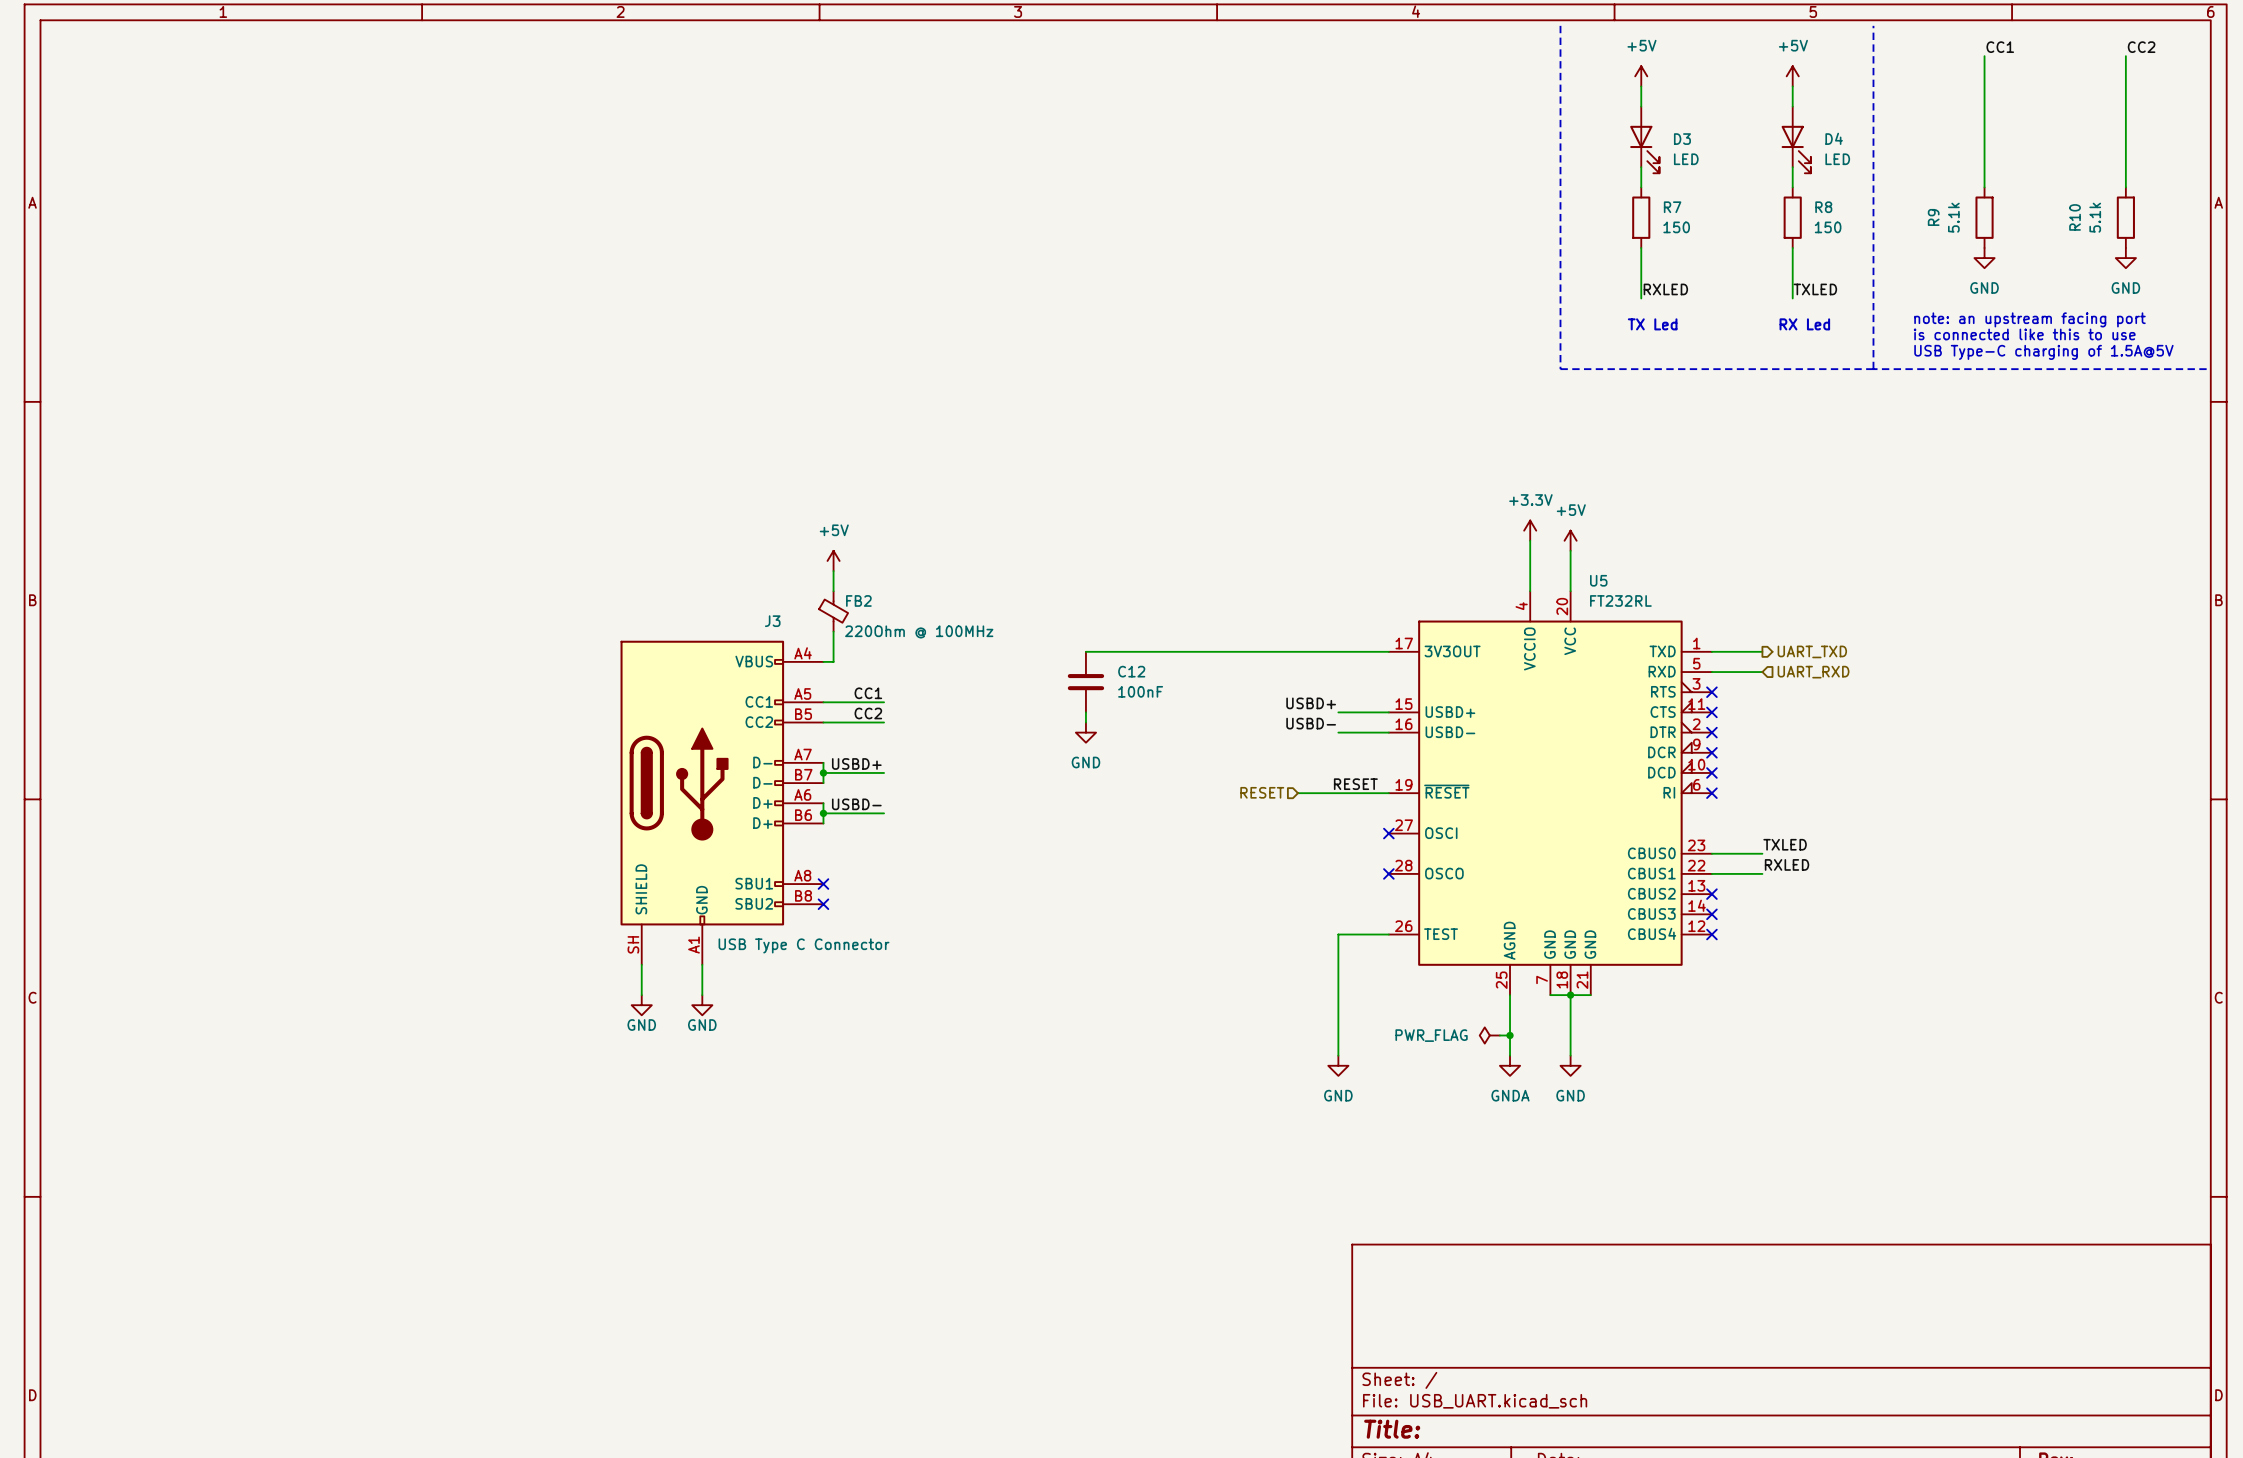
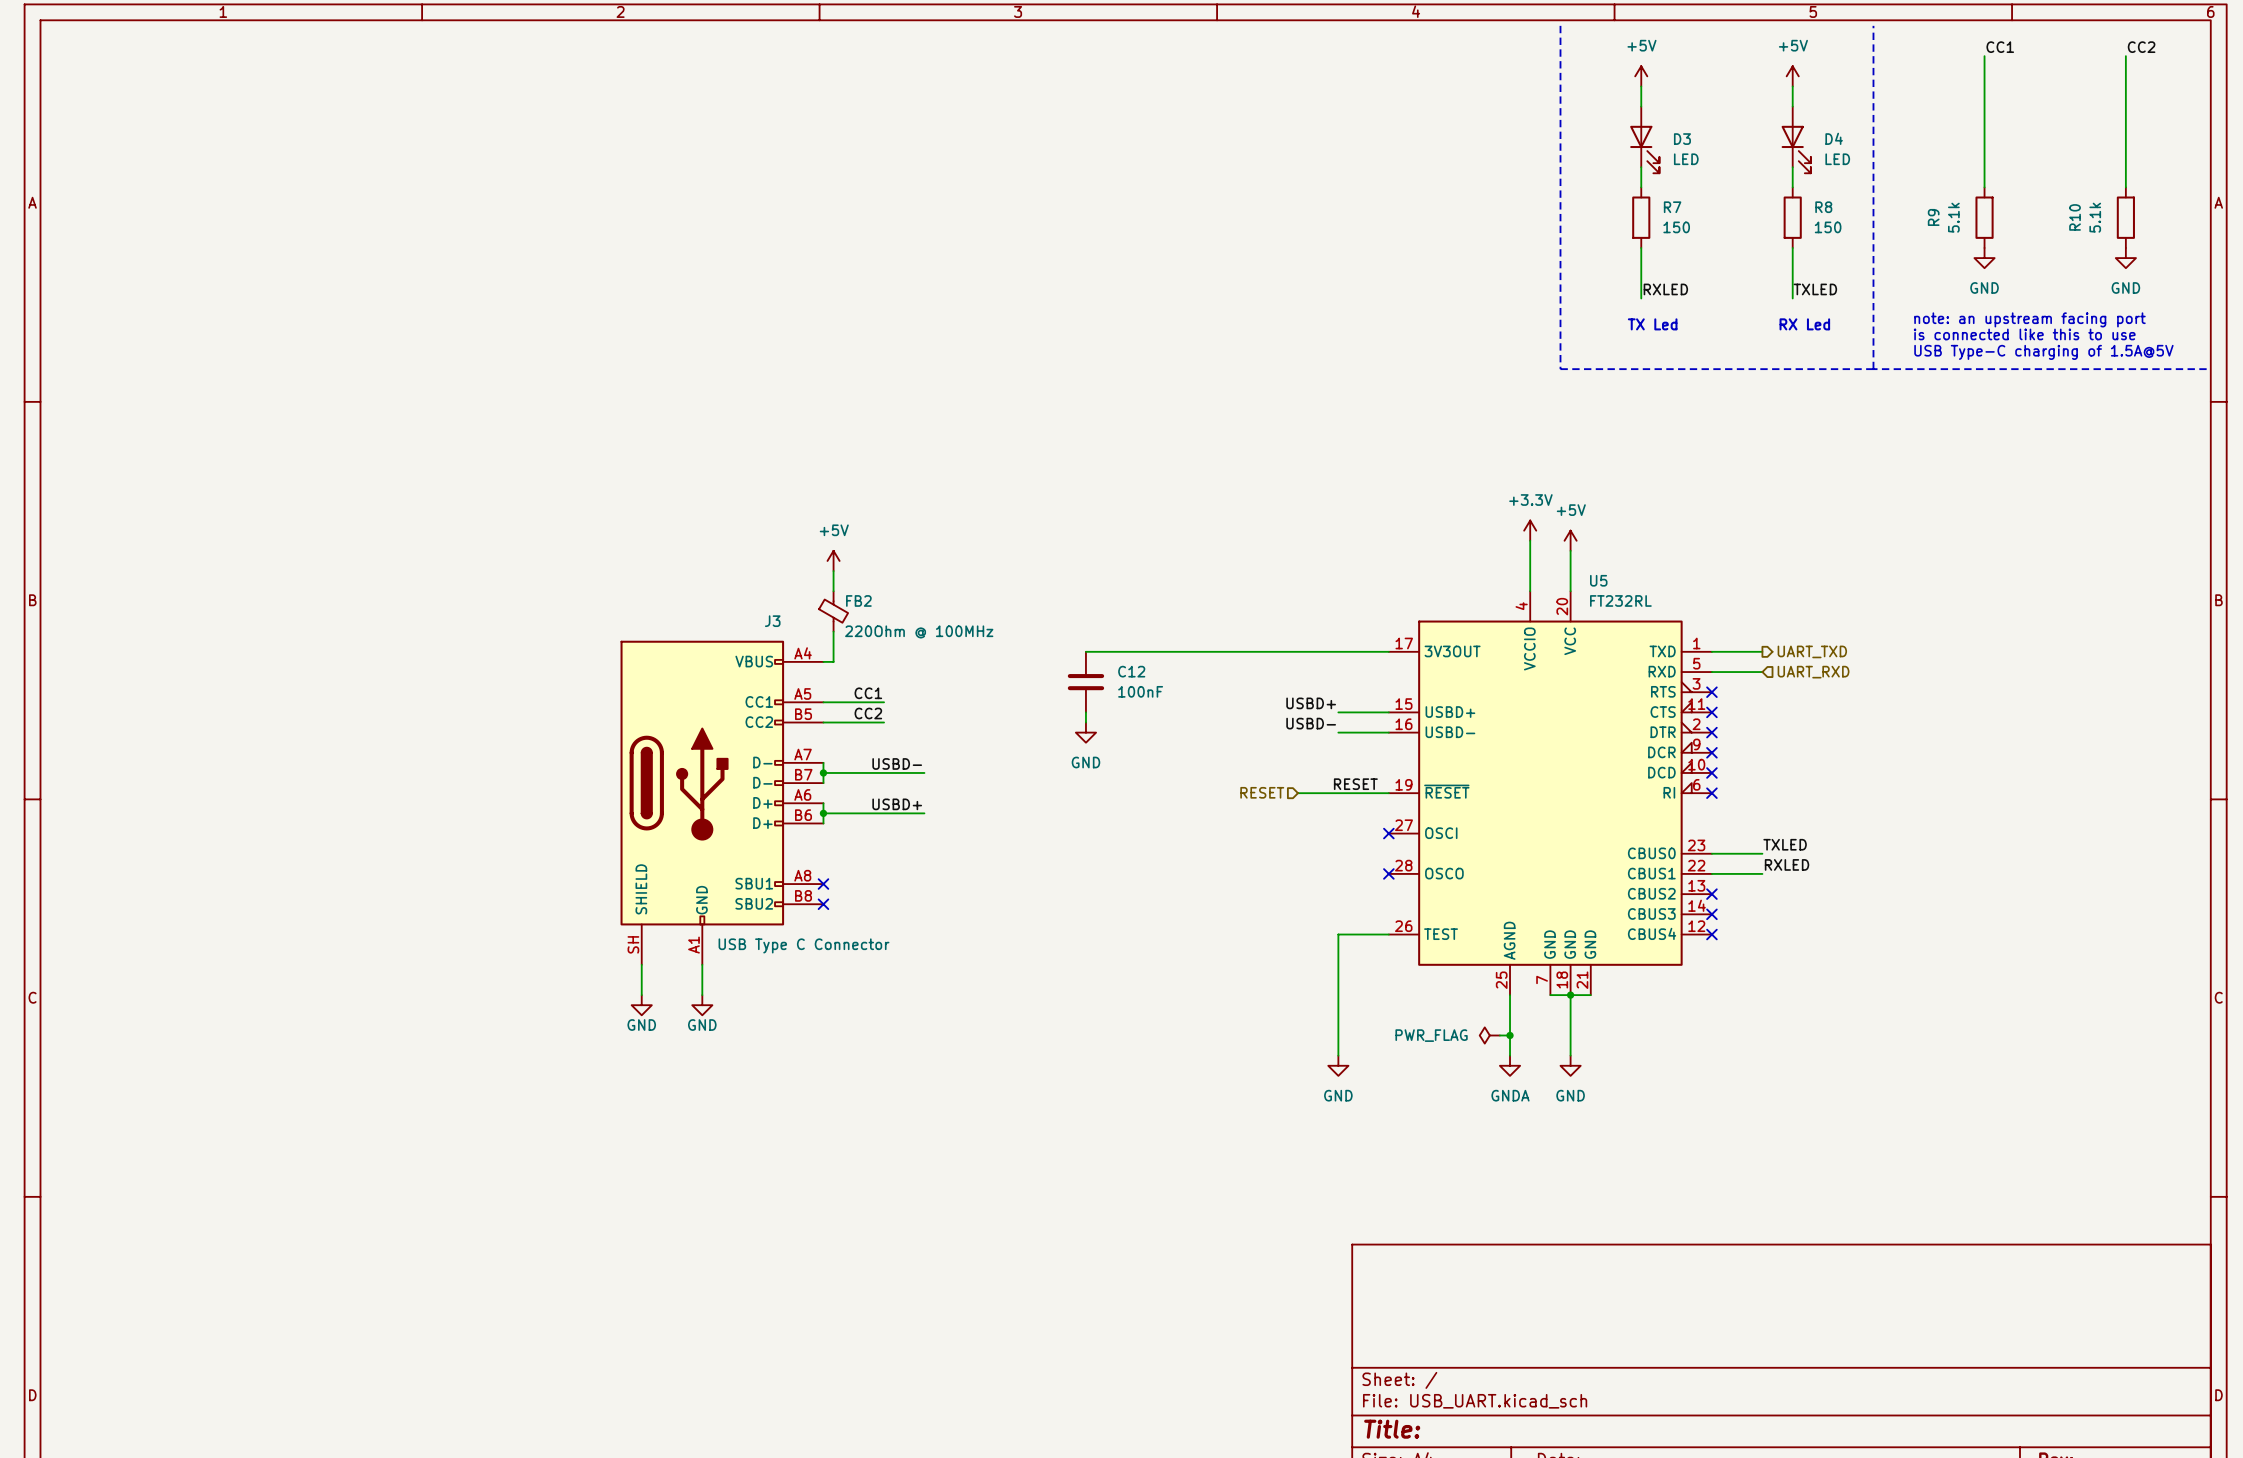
label position: USBD+ (856, 763) -> USBD+ (897, 804)
wire: none -> (884, 772) (924, 772)
label position: USBD- (856, 804) -> USBD- (897, 763)
wire: none -> (884, 813) (924, 813)

